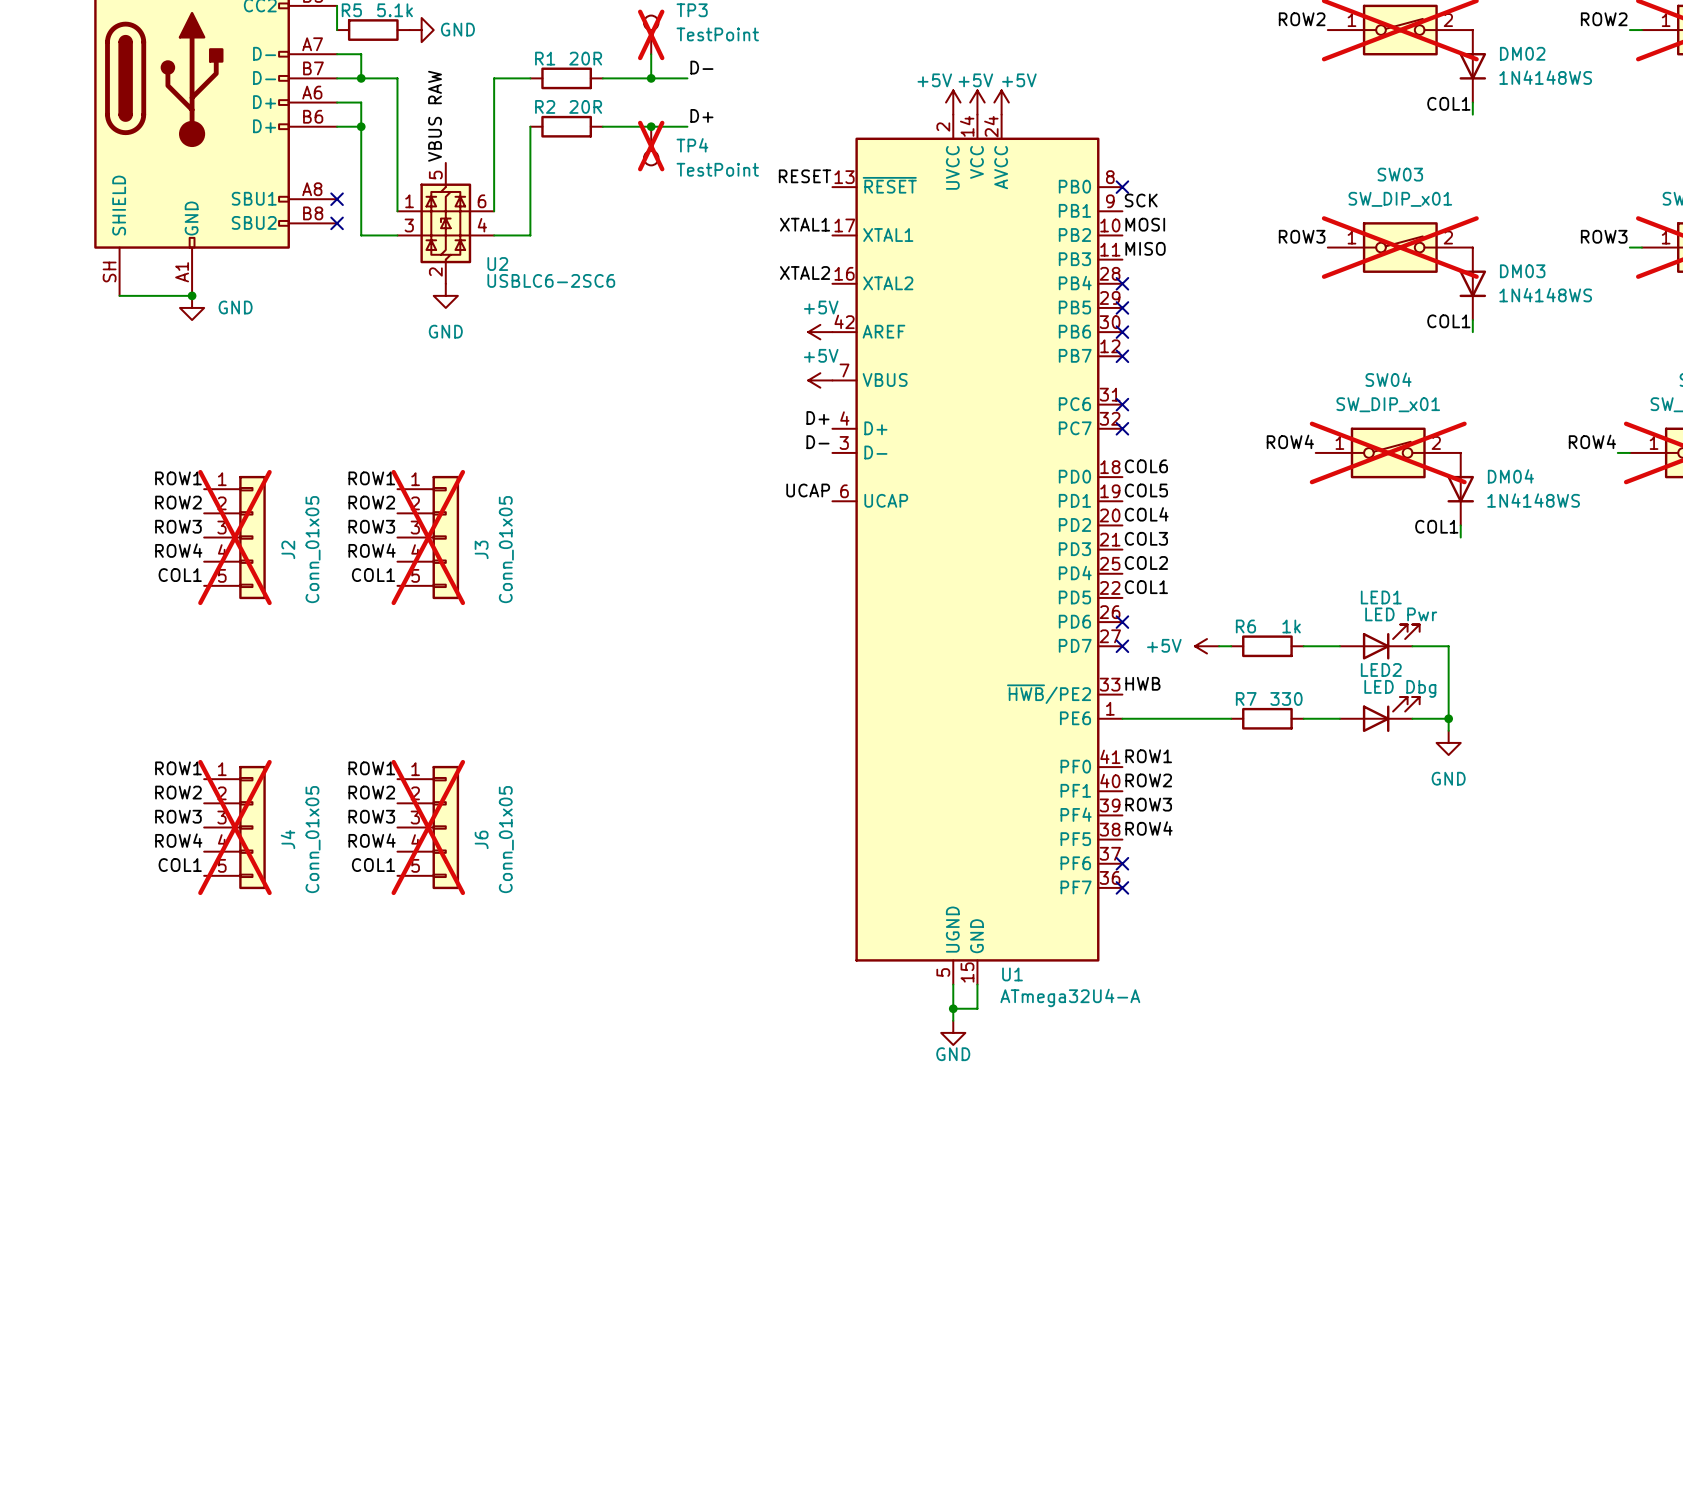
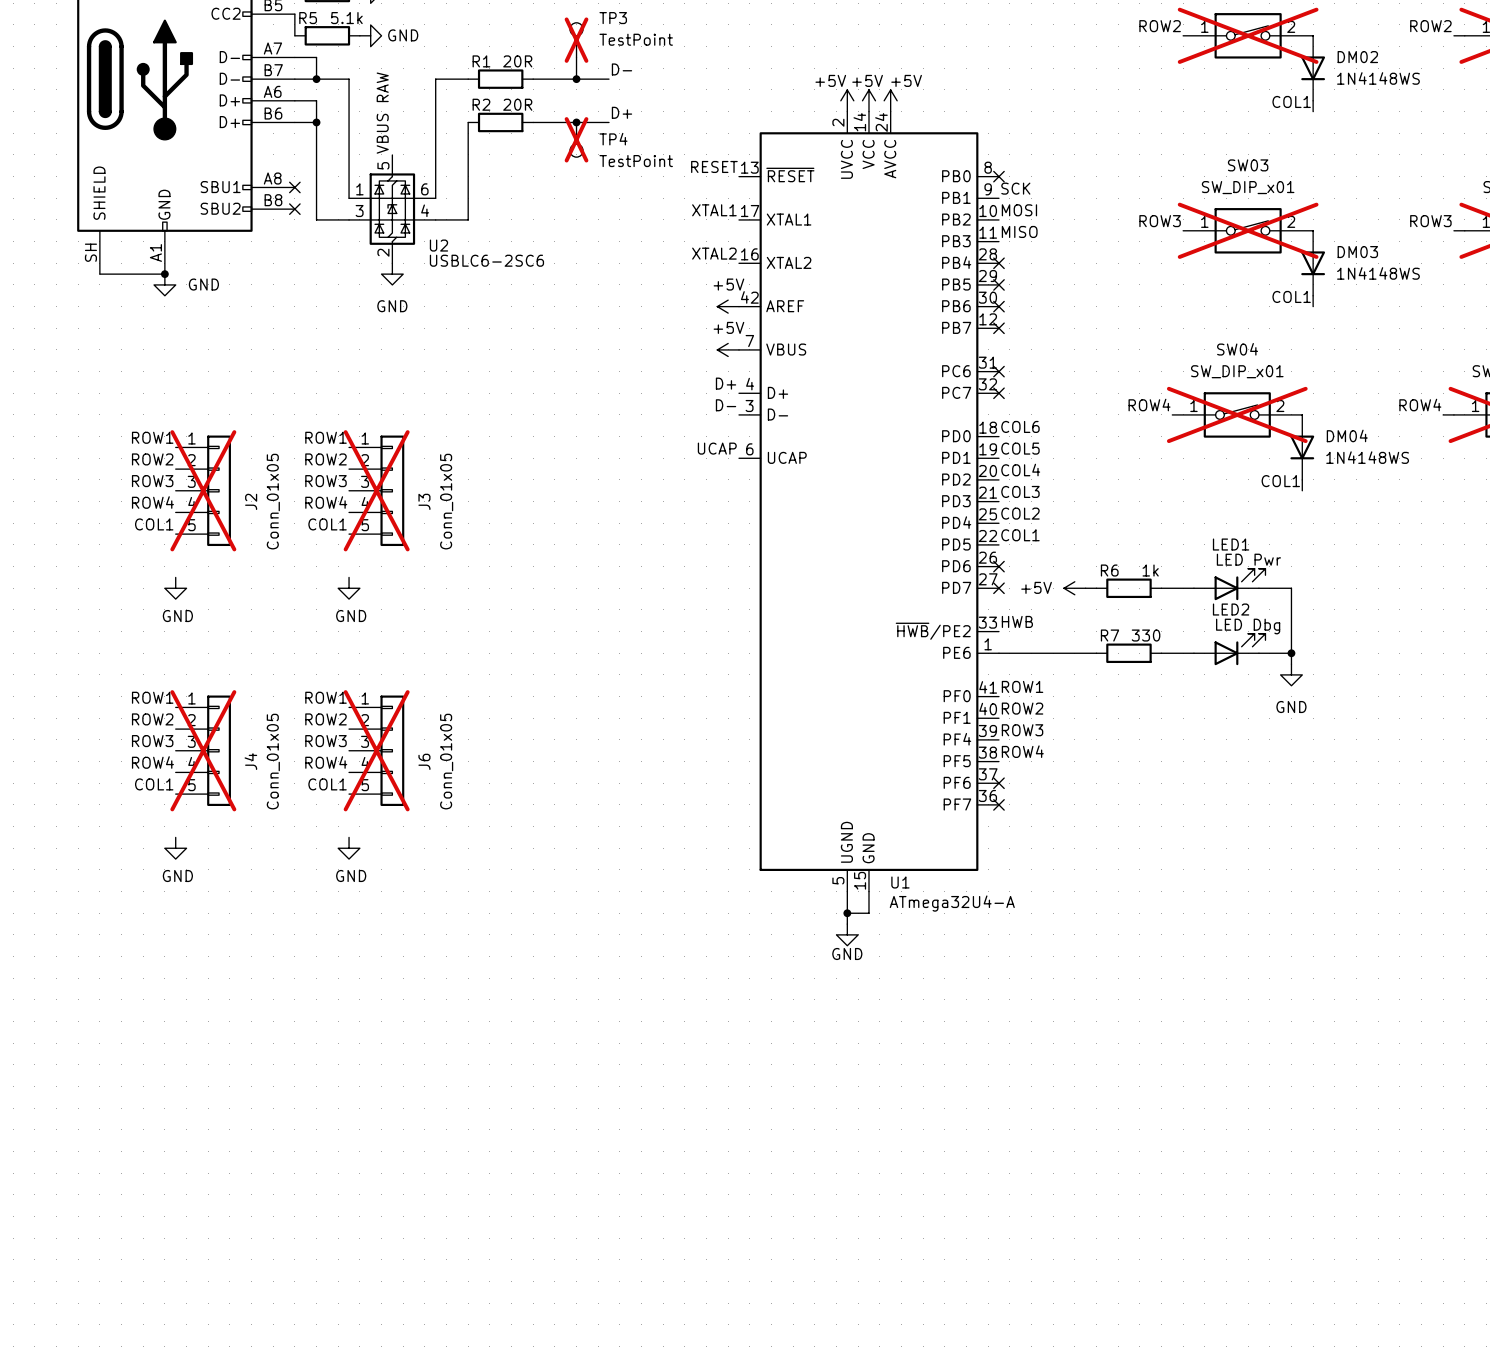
power symbol: none -> GND (175, 588)
power symbol: none -> GND (349, 588)
power symbol: none -> GND (175, 848)
power symbol: none -> GND (349, 848)

